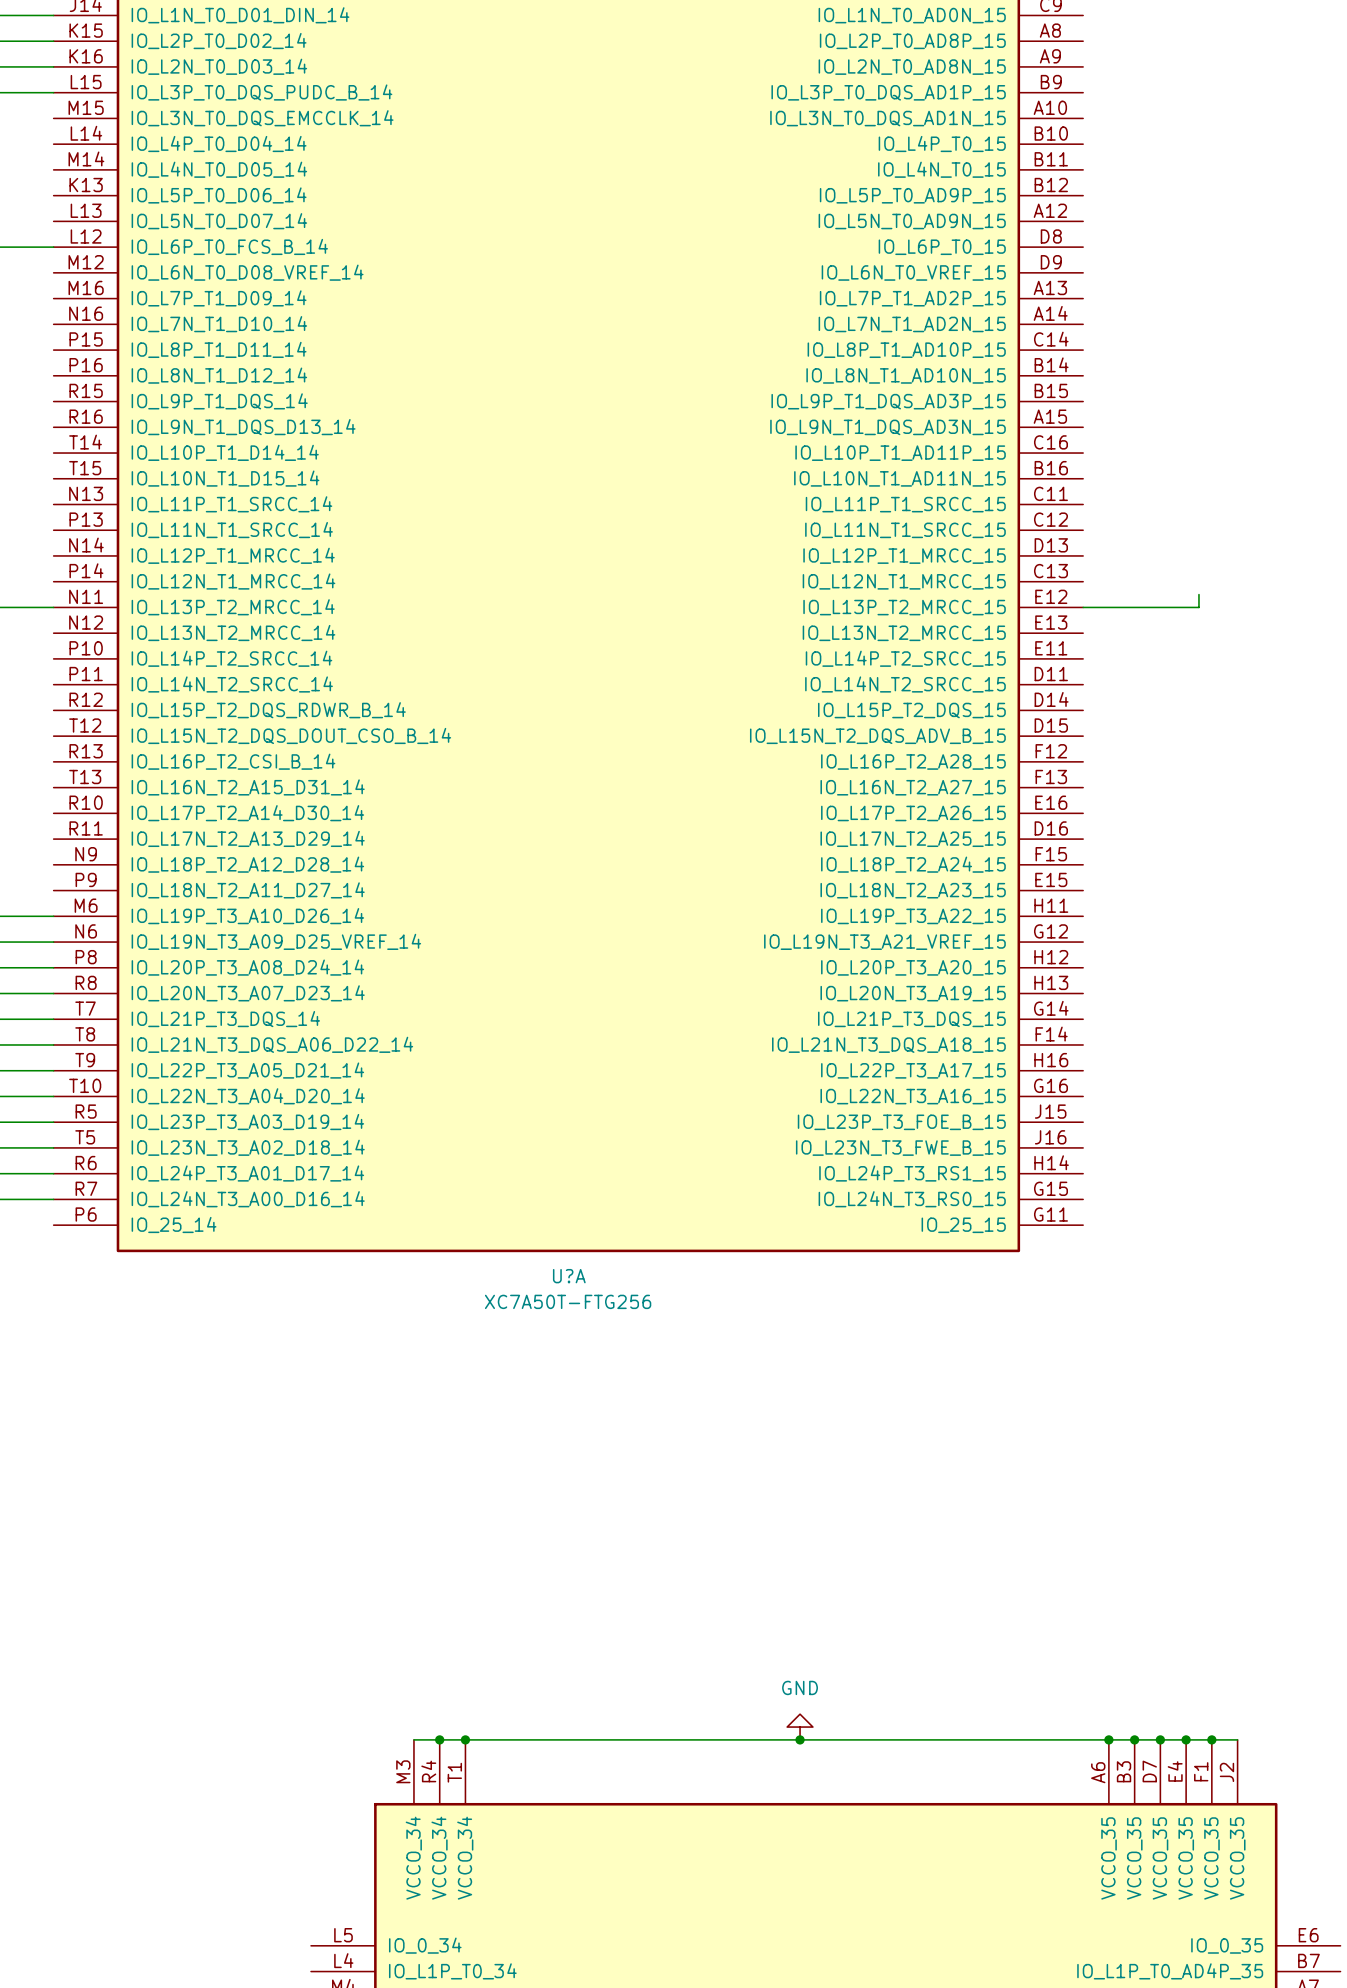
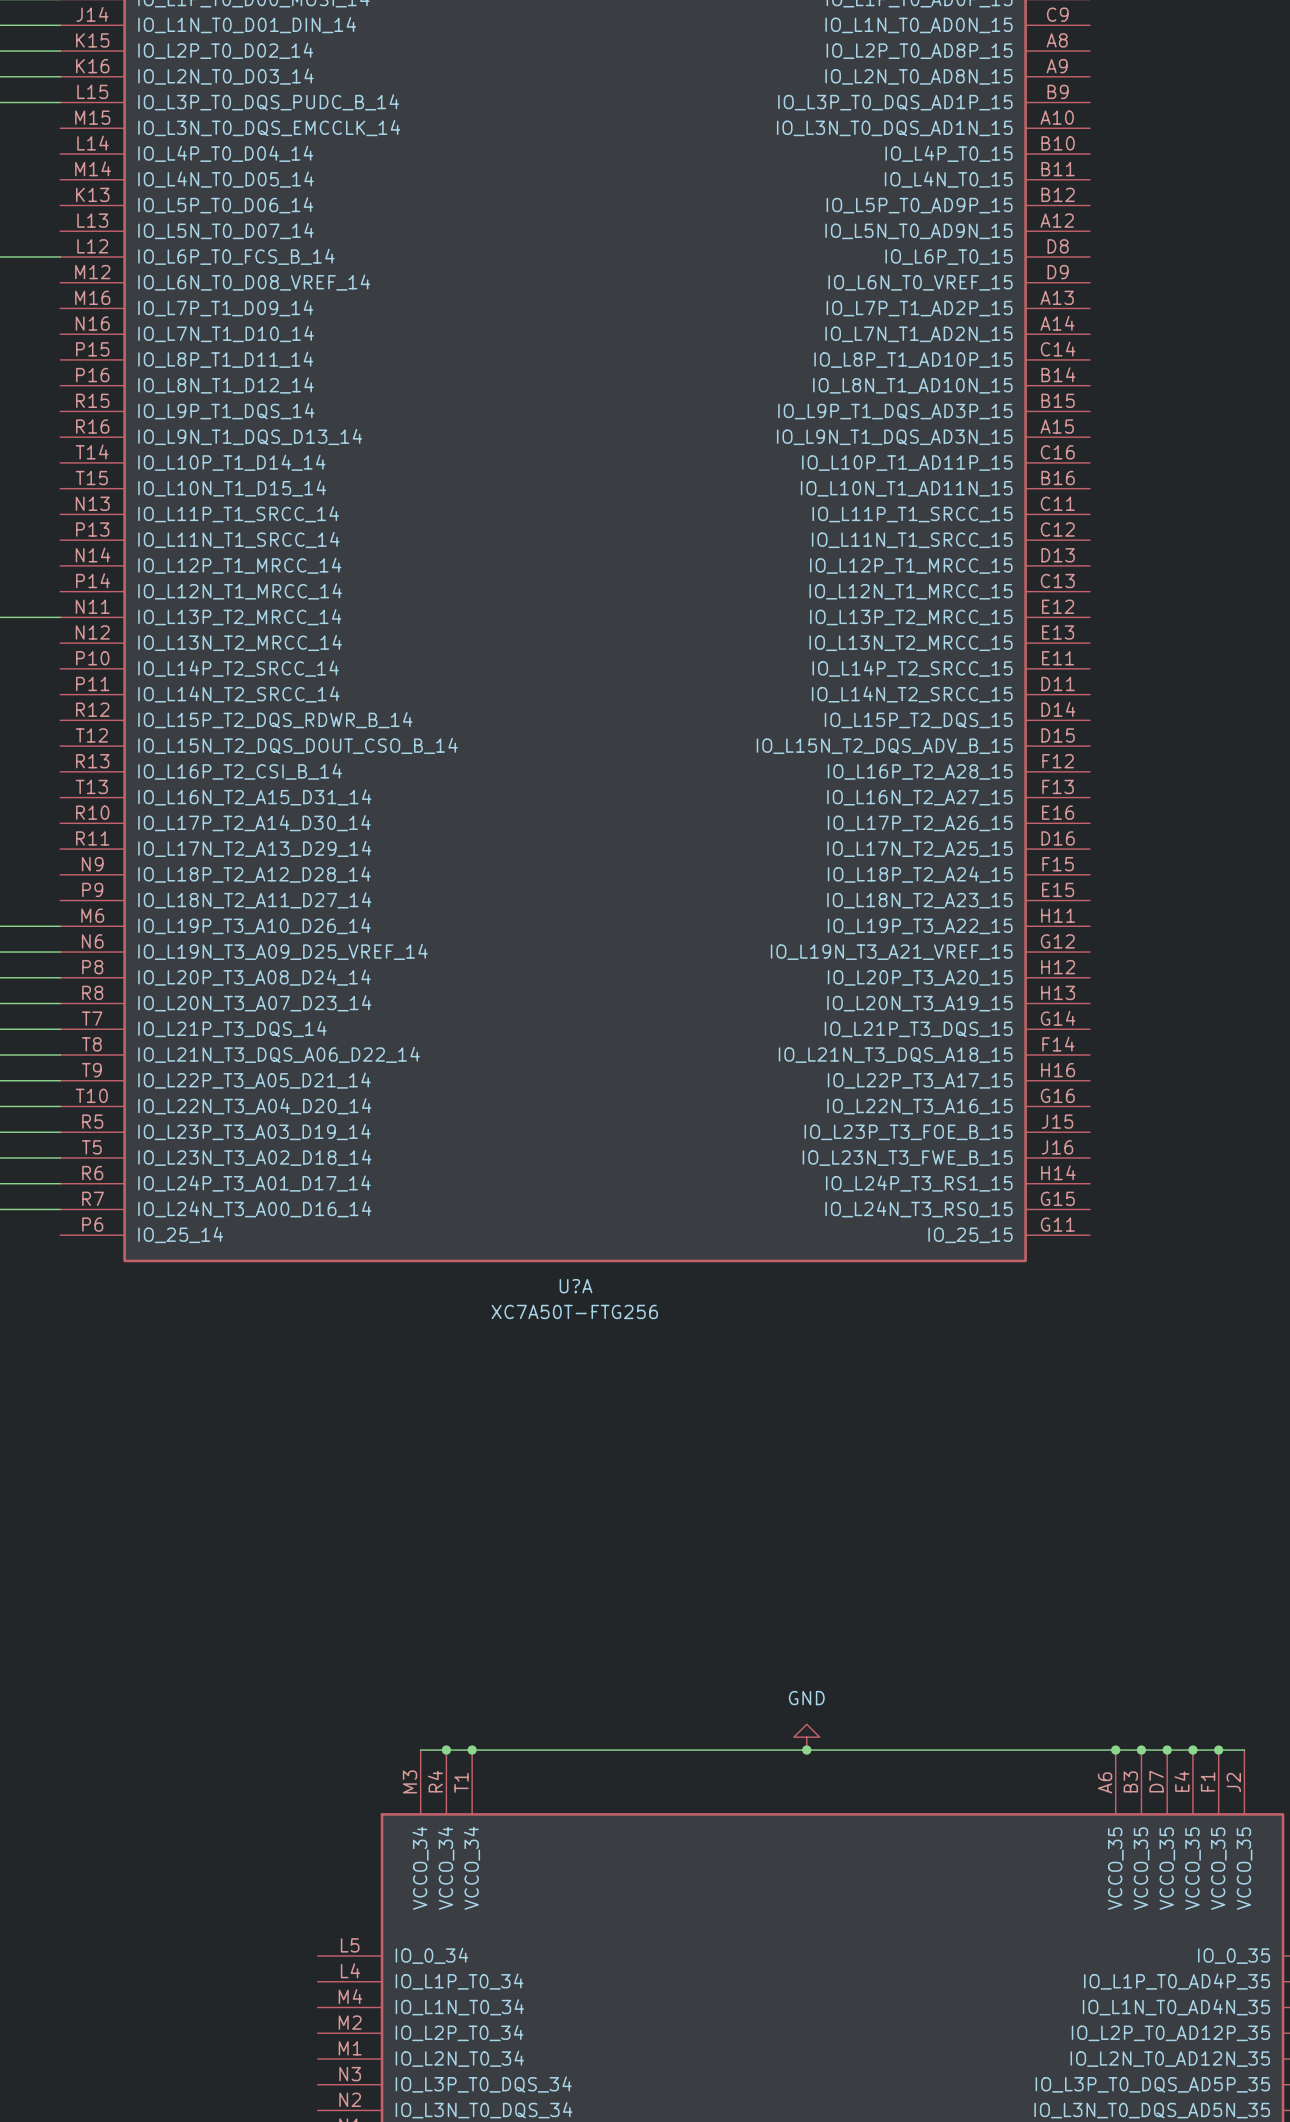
wire: (1198, 594) (1198, 607) (1083, 607) -> none

